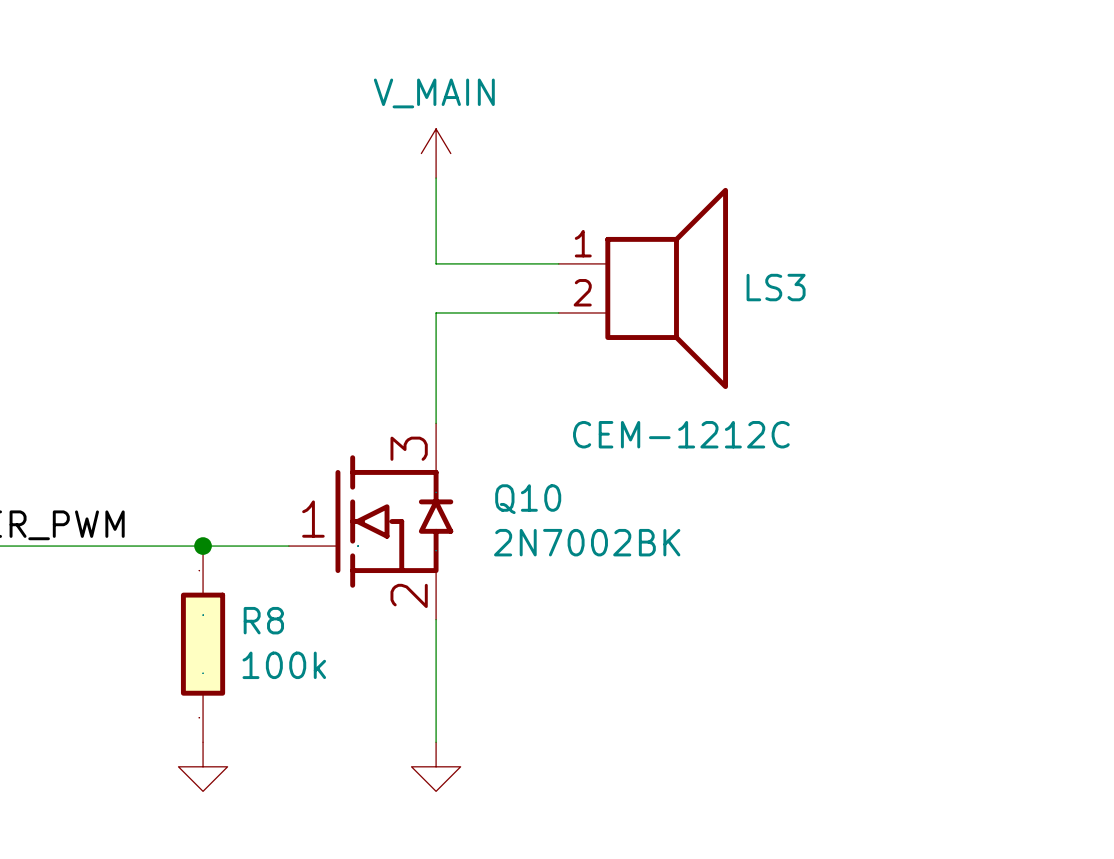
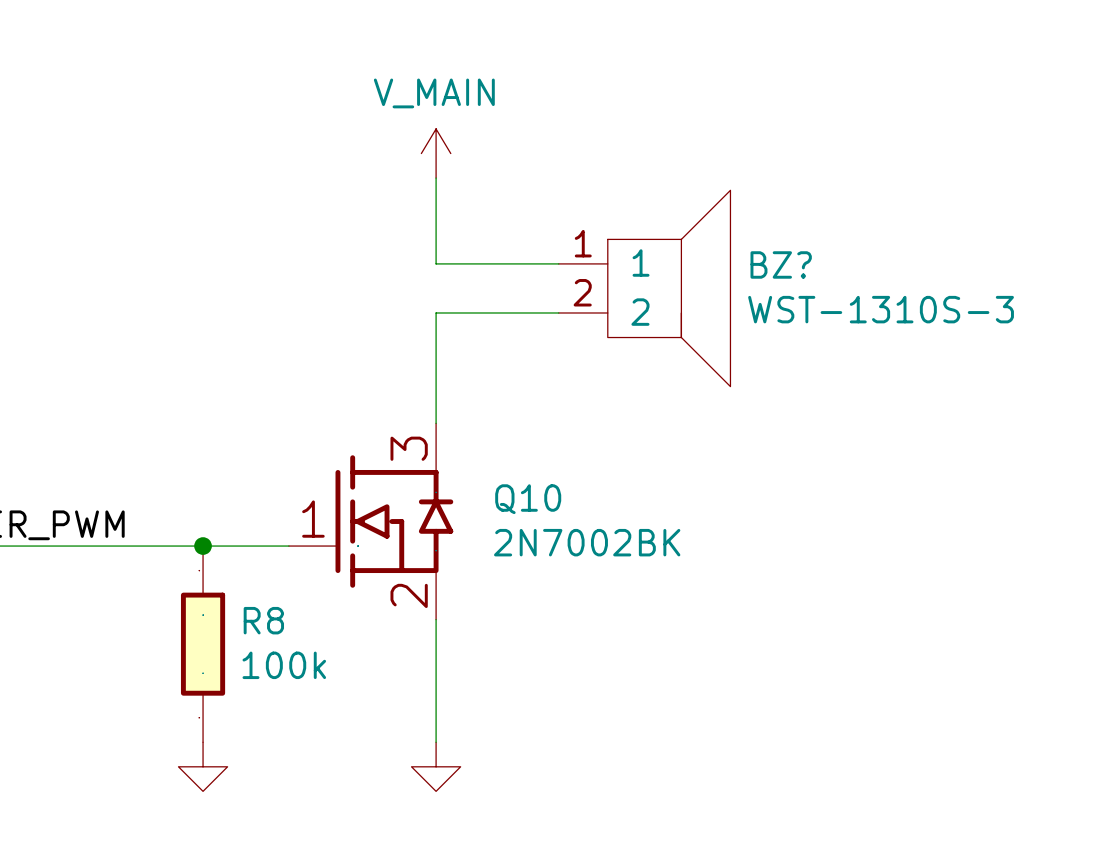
LS3: (643, 288) -> none
BZ?: none -> WST-1310S-3 (644, 288)

